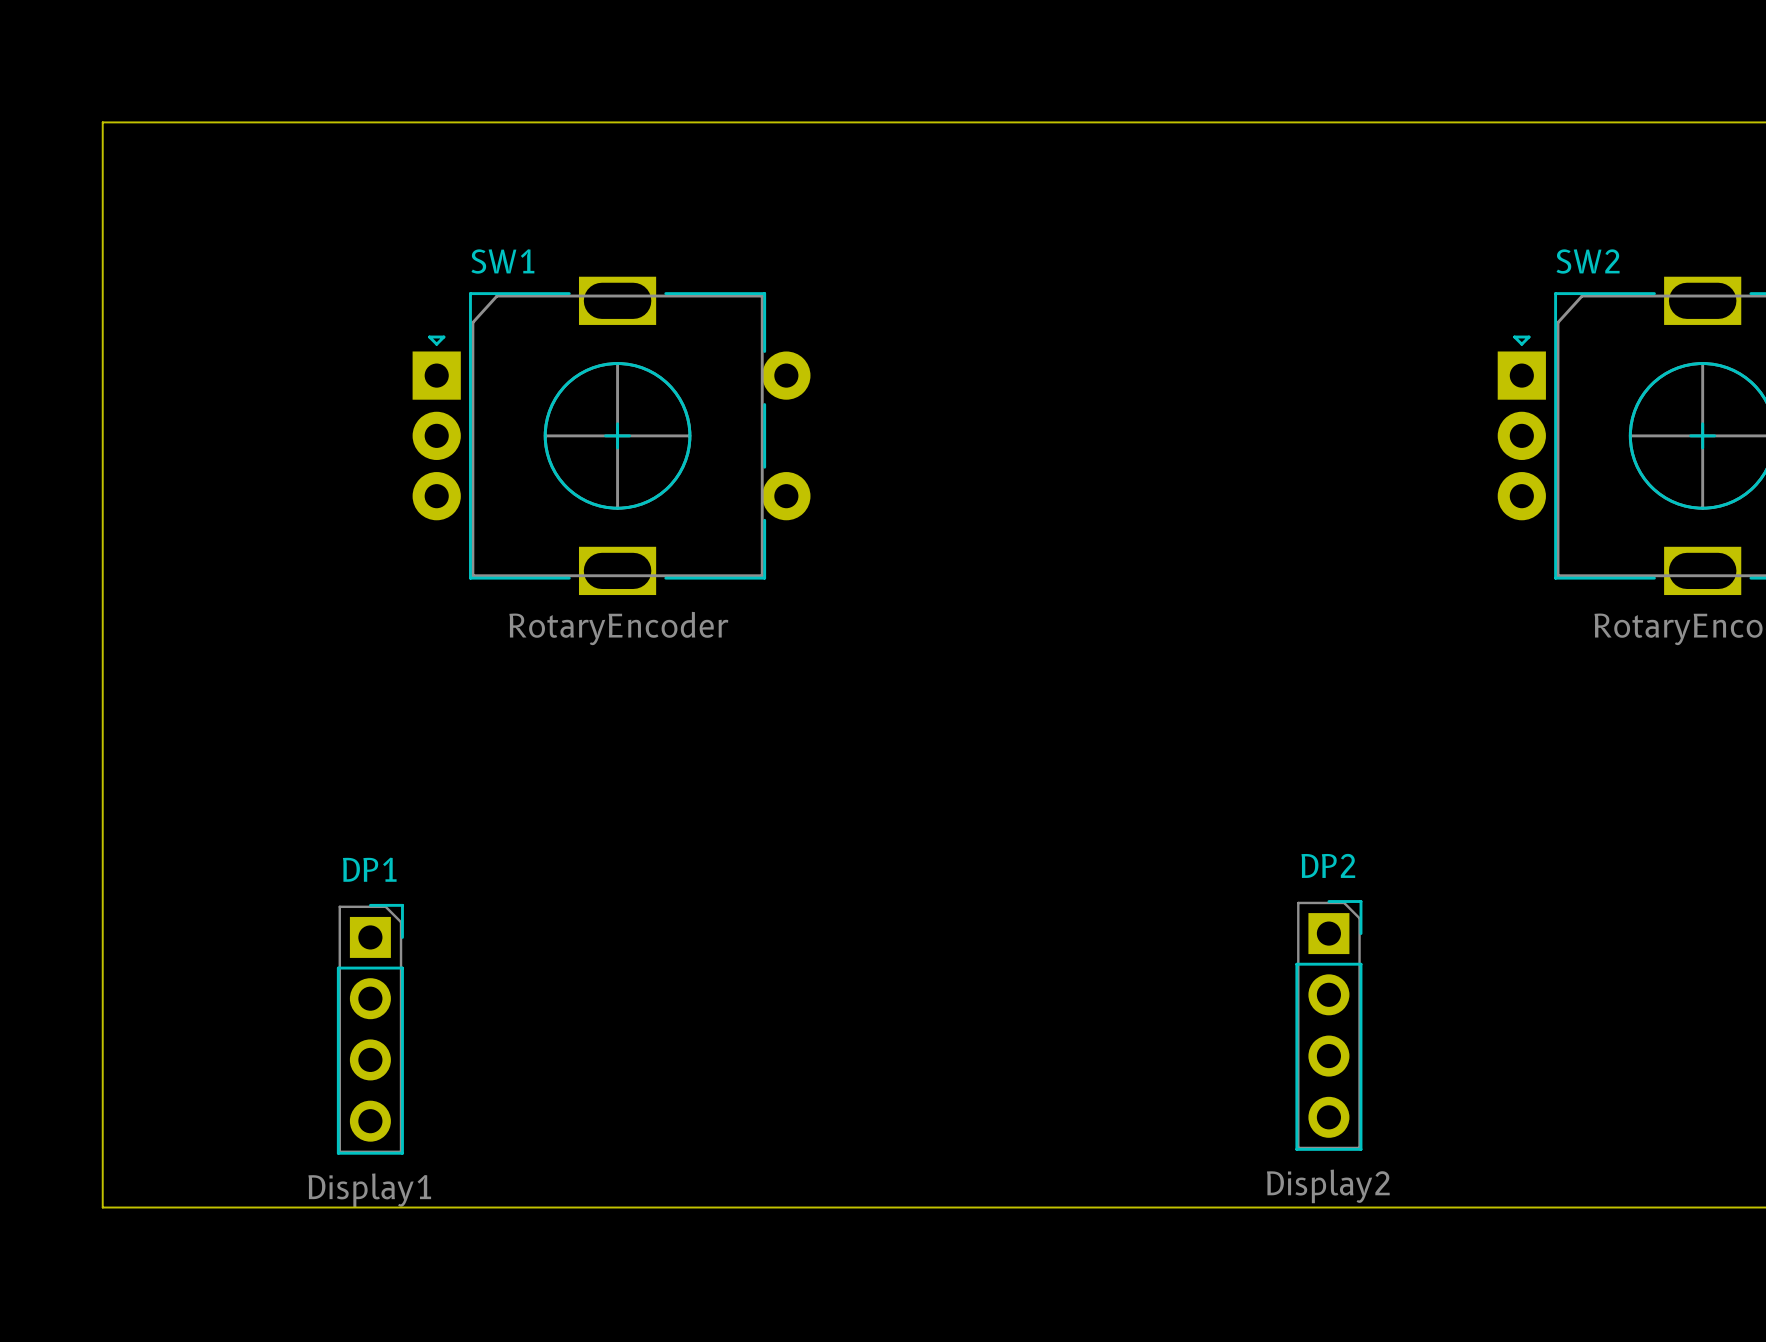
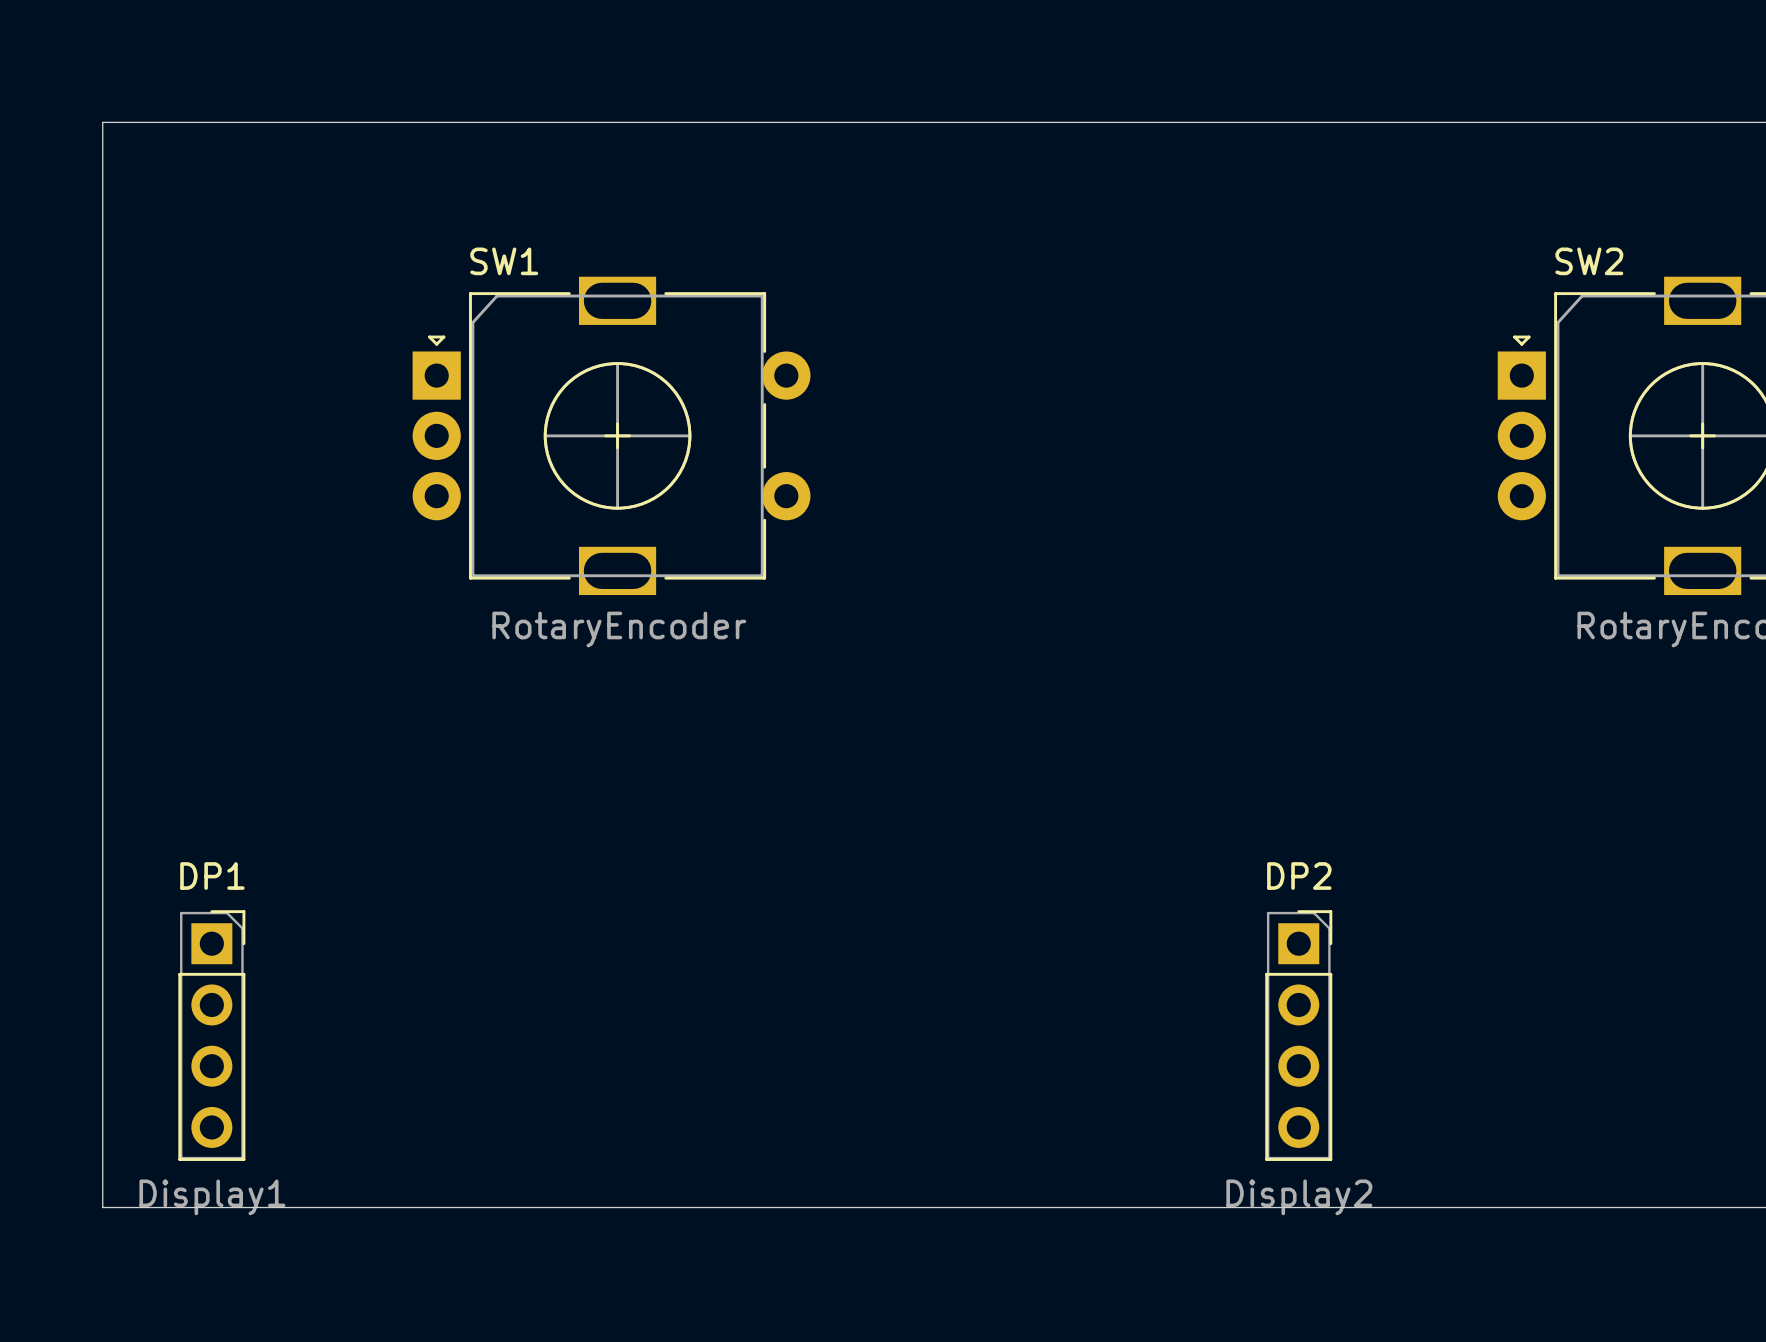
DP2 position: (1328, 1025) -> (1298, 1035)
DP1 position: (370, 1029) -> (211, 1035)

